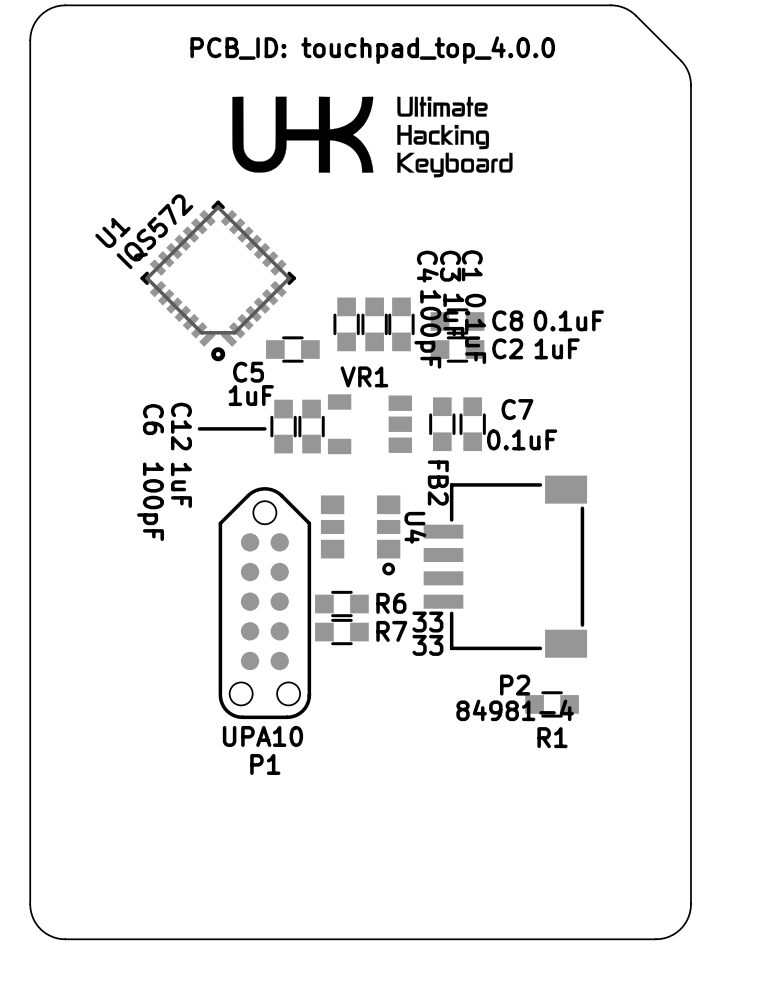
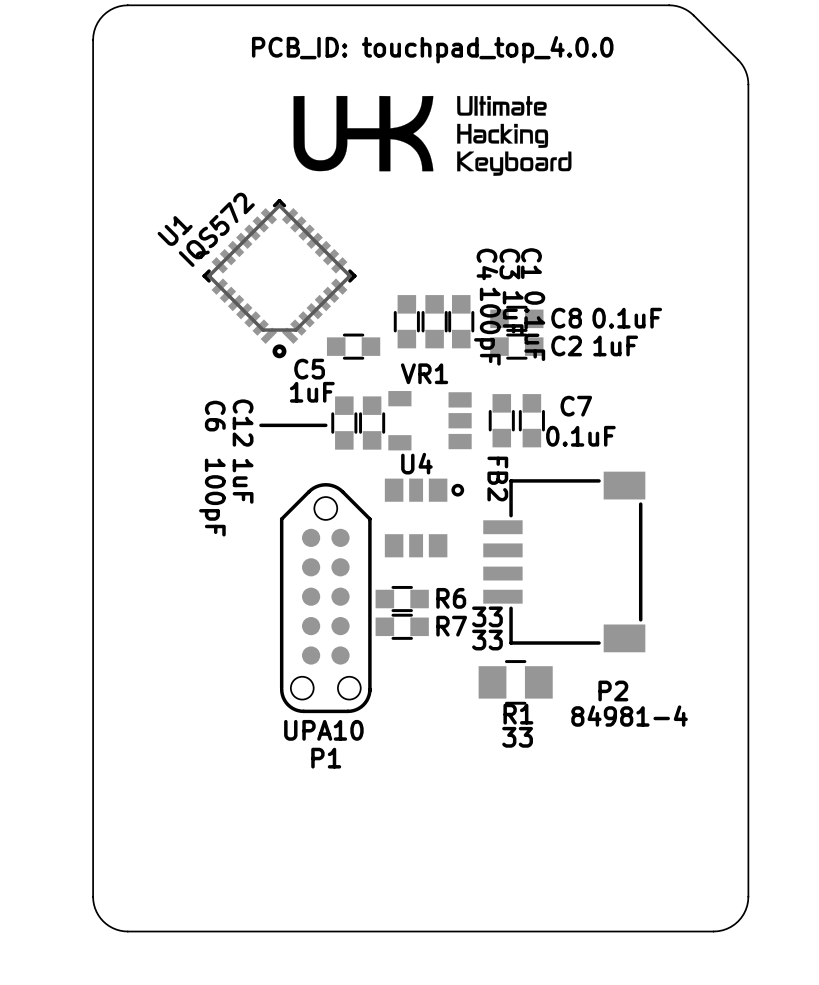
U4 rotation: 0° (360, 535) -> 90° counterclockwise (424, 517)
P2 name position: P2 (515, 685) -> P2 (613, 690)
R1 footprint: [525, 691, 579, 718] -> [478, 660, 553, 705]
text position: 84981-4 (515, 710) -> 84981-4 (629, 716)
R1 value: none -> 33 (517, 737)

